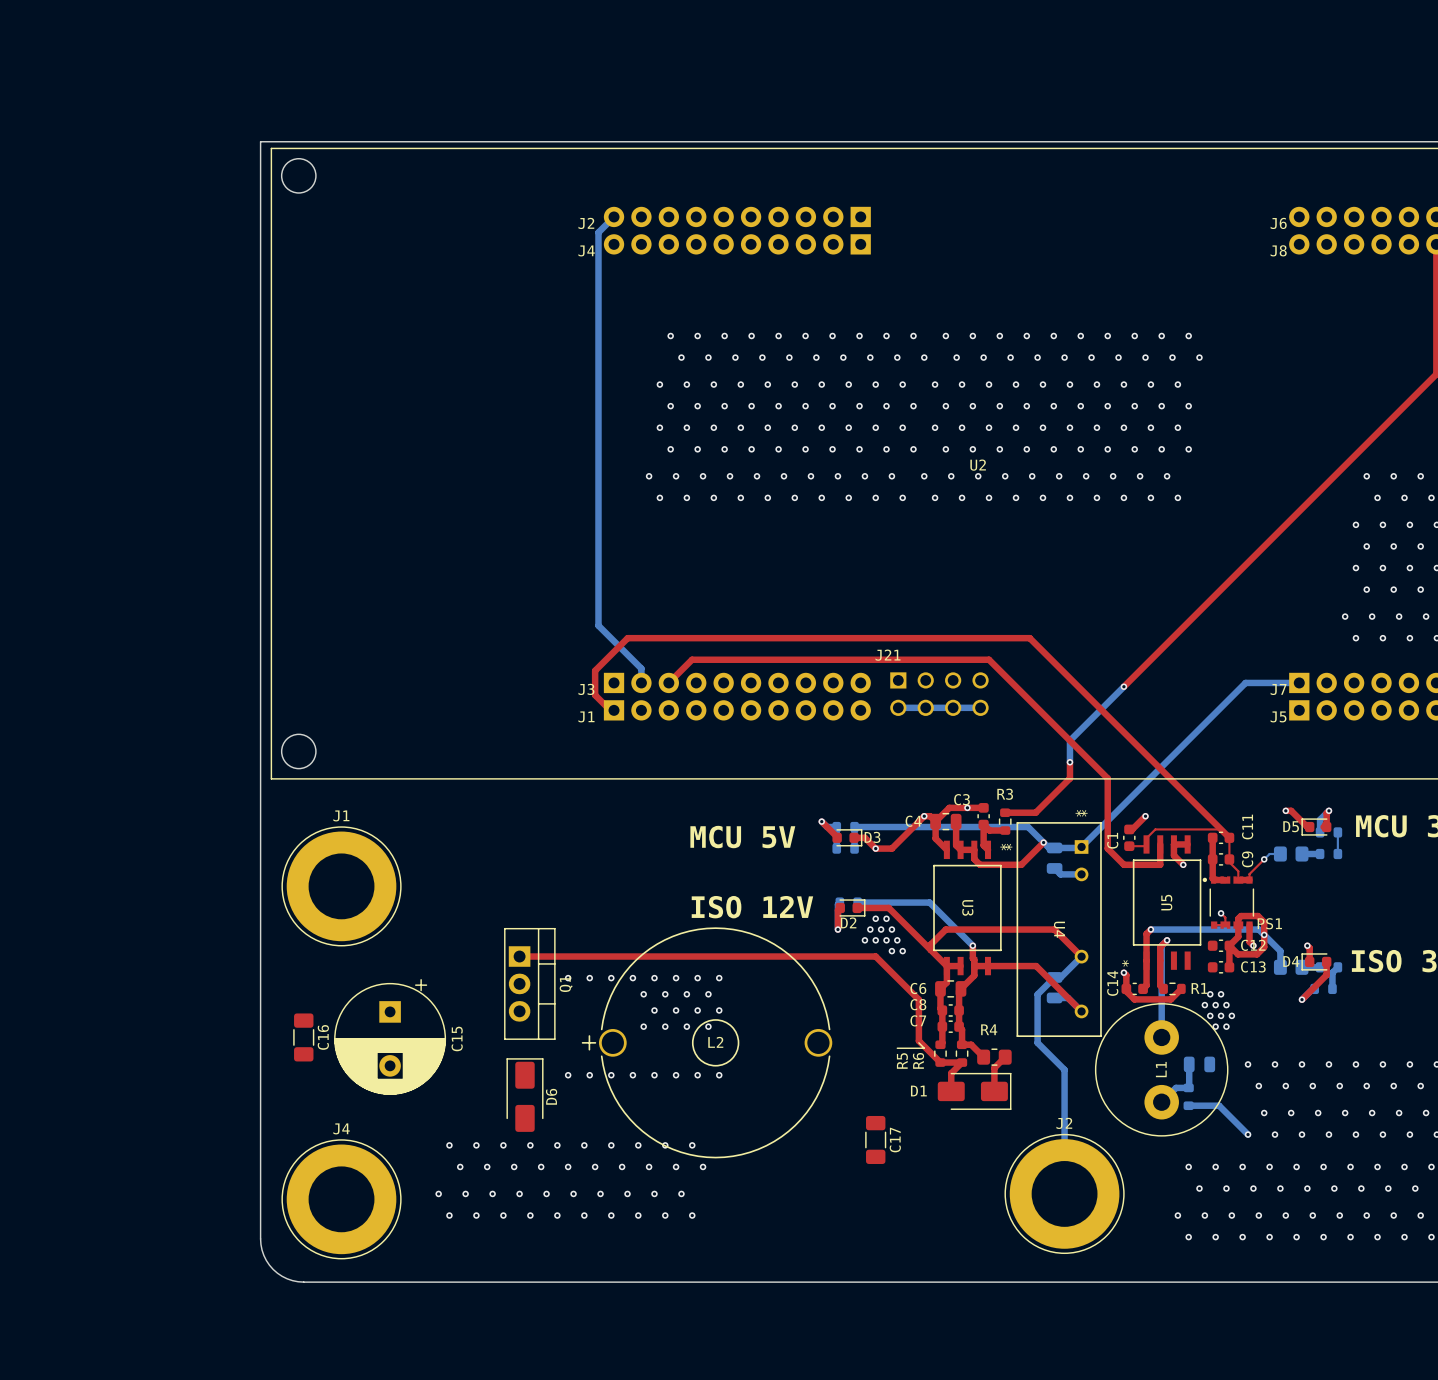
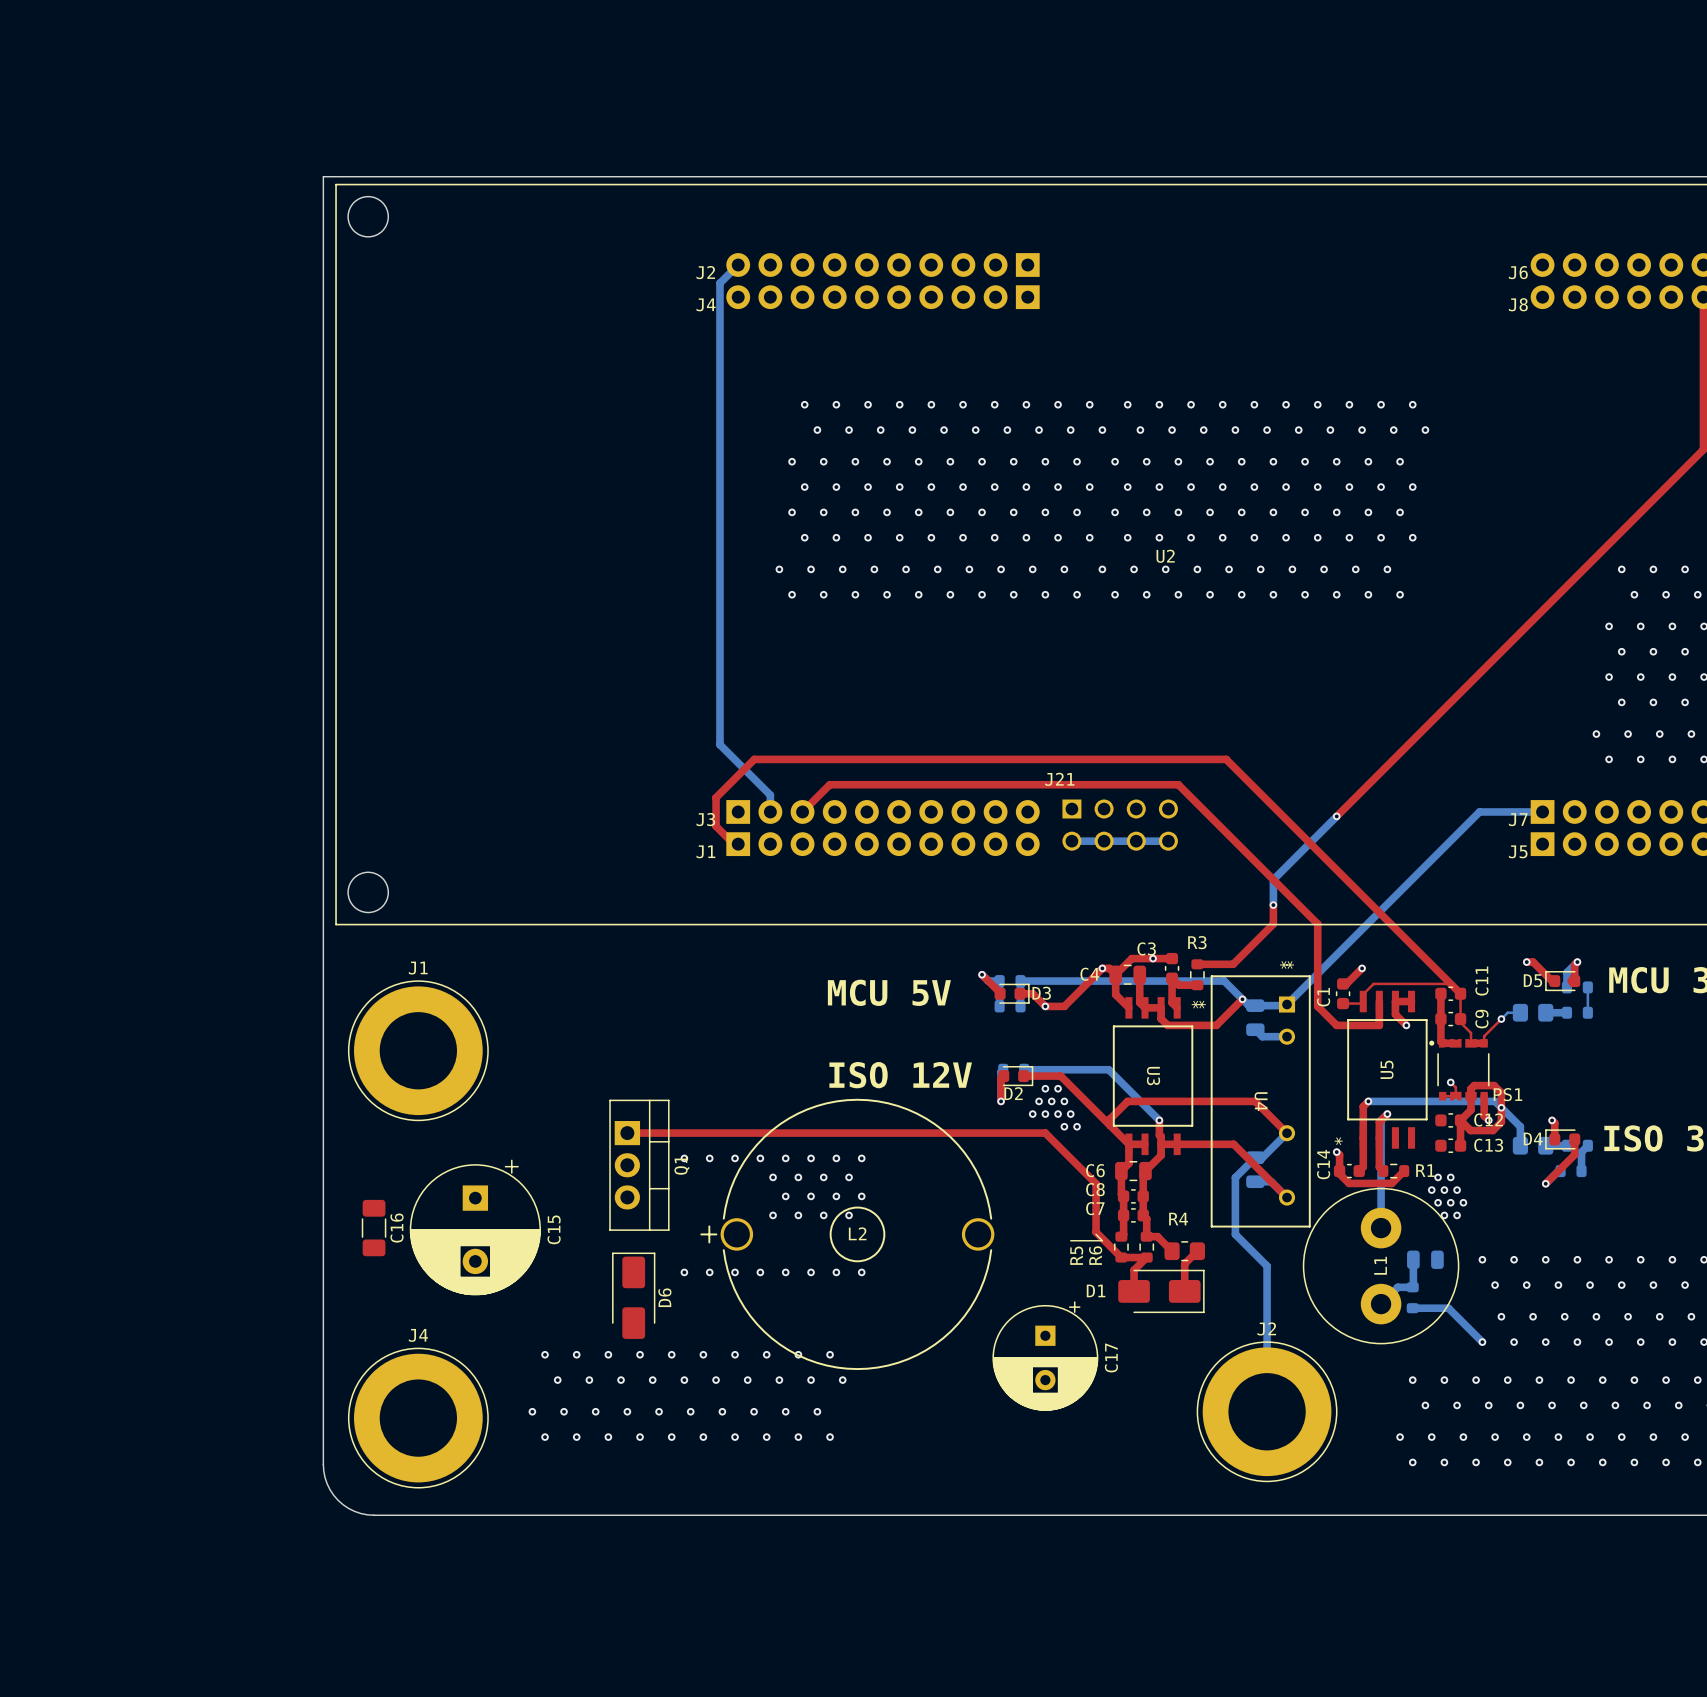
C17 footprint: [865, 1115, 887, 1164] -> [992, 1301, 1099, 1411]
C17 name position: C17 (895, 1140) -> C17 (1111, 1357)

